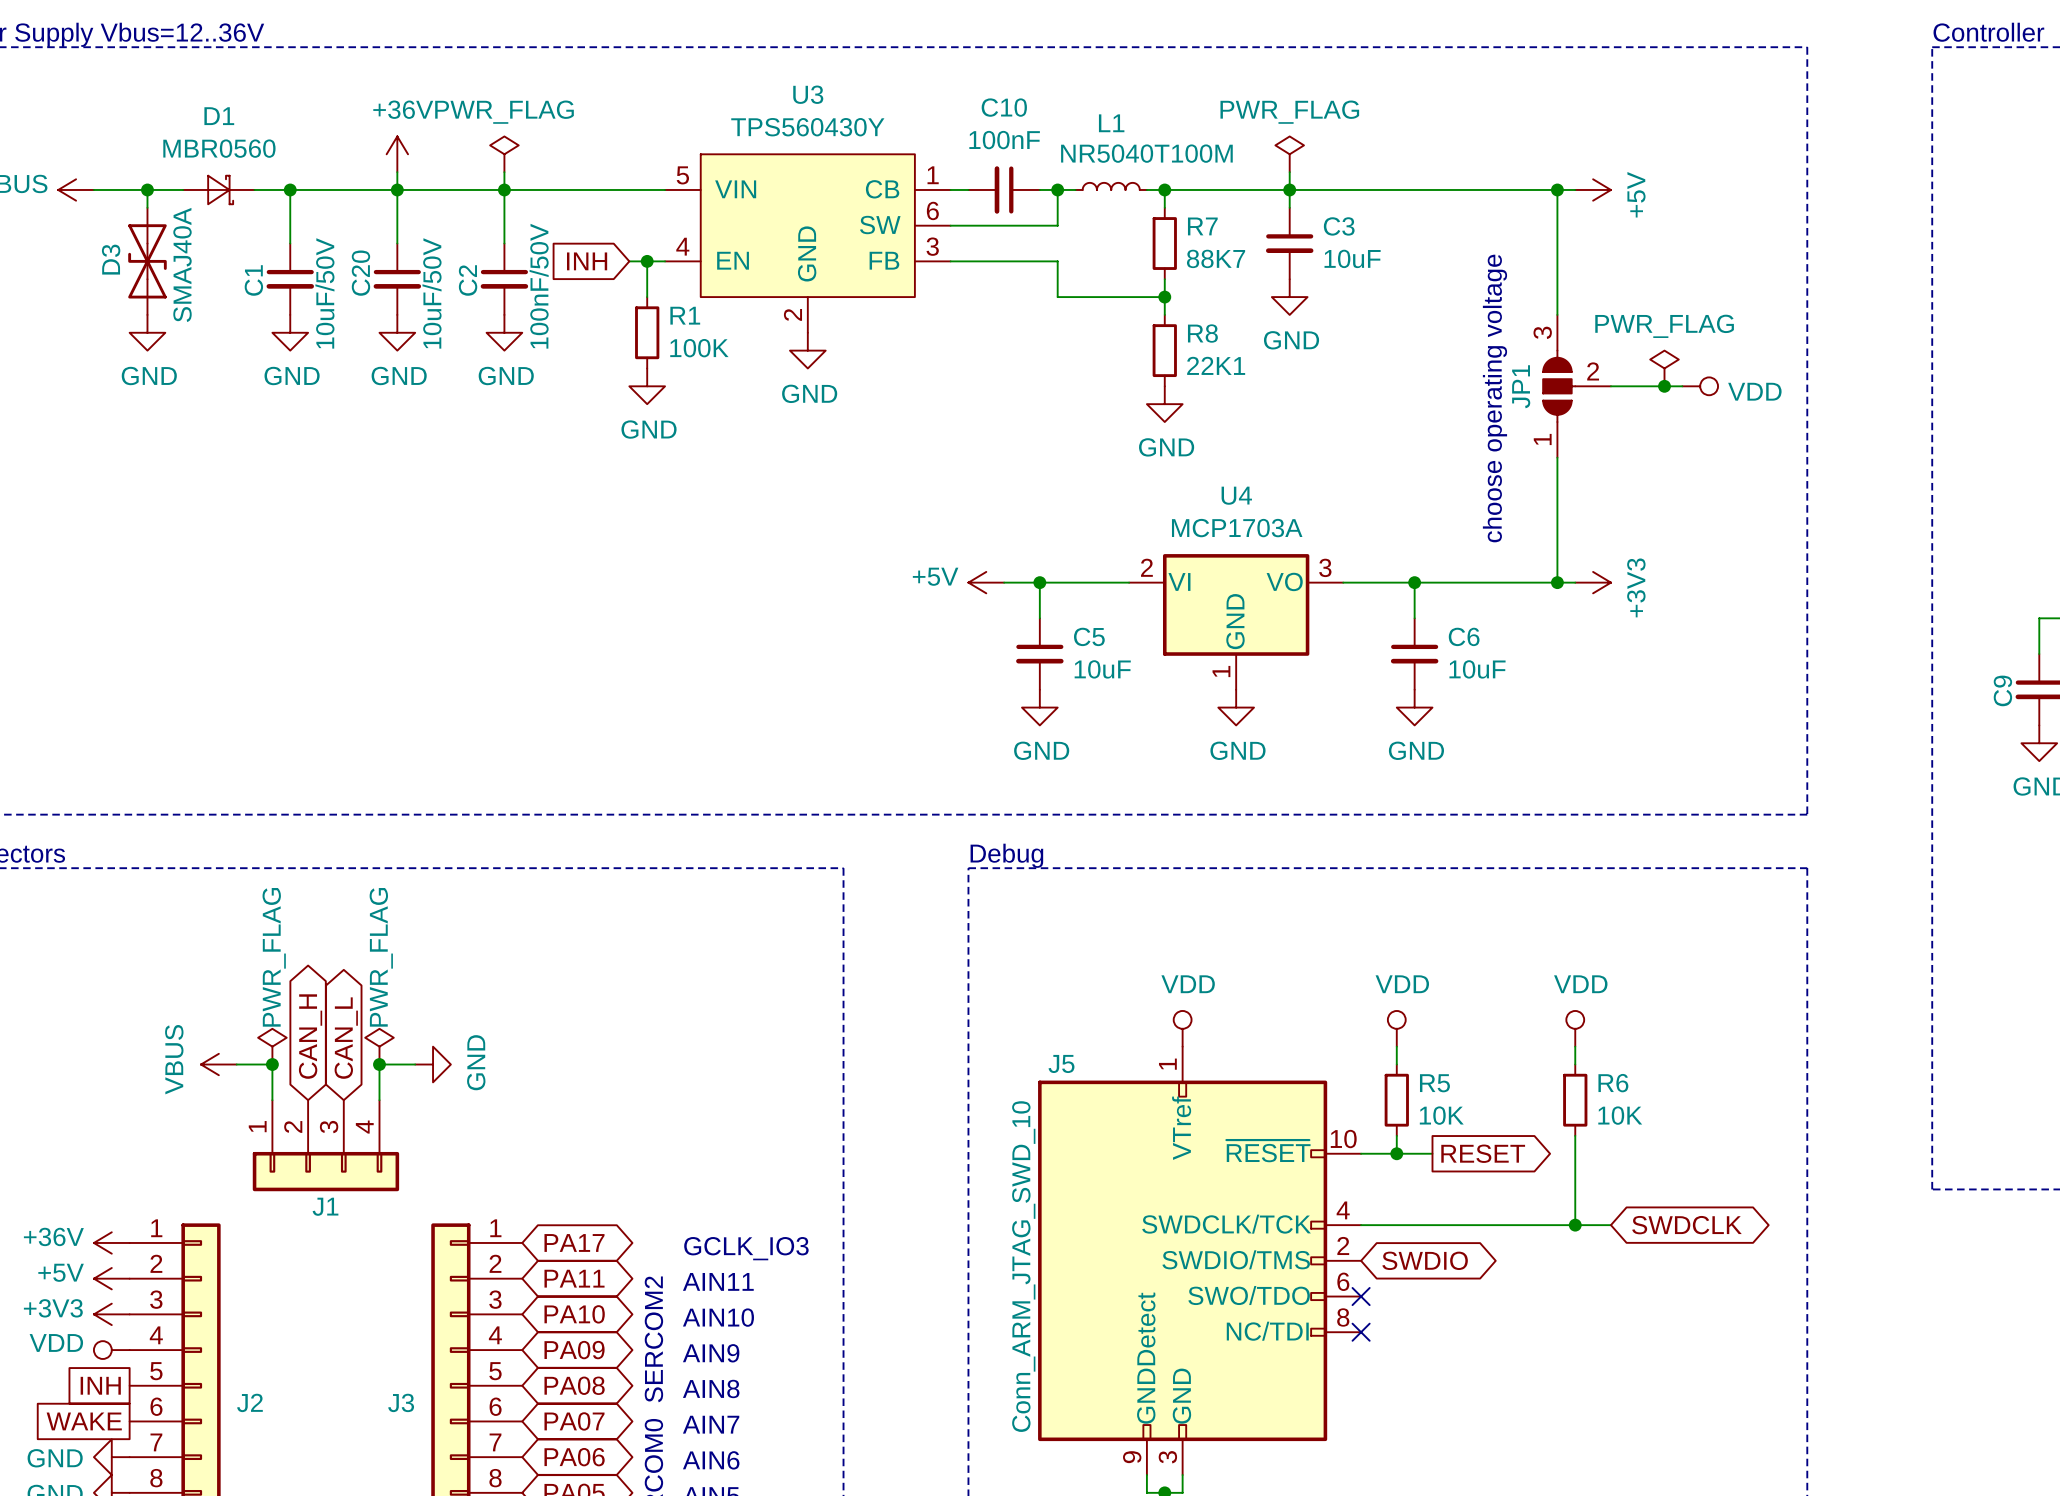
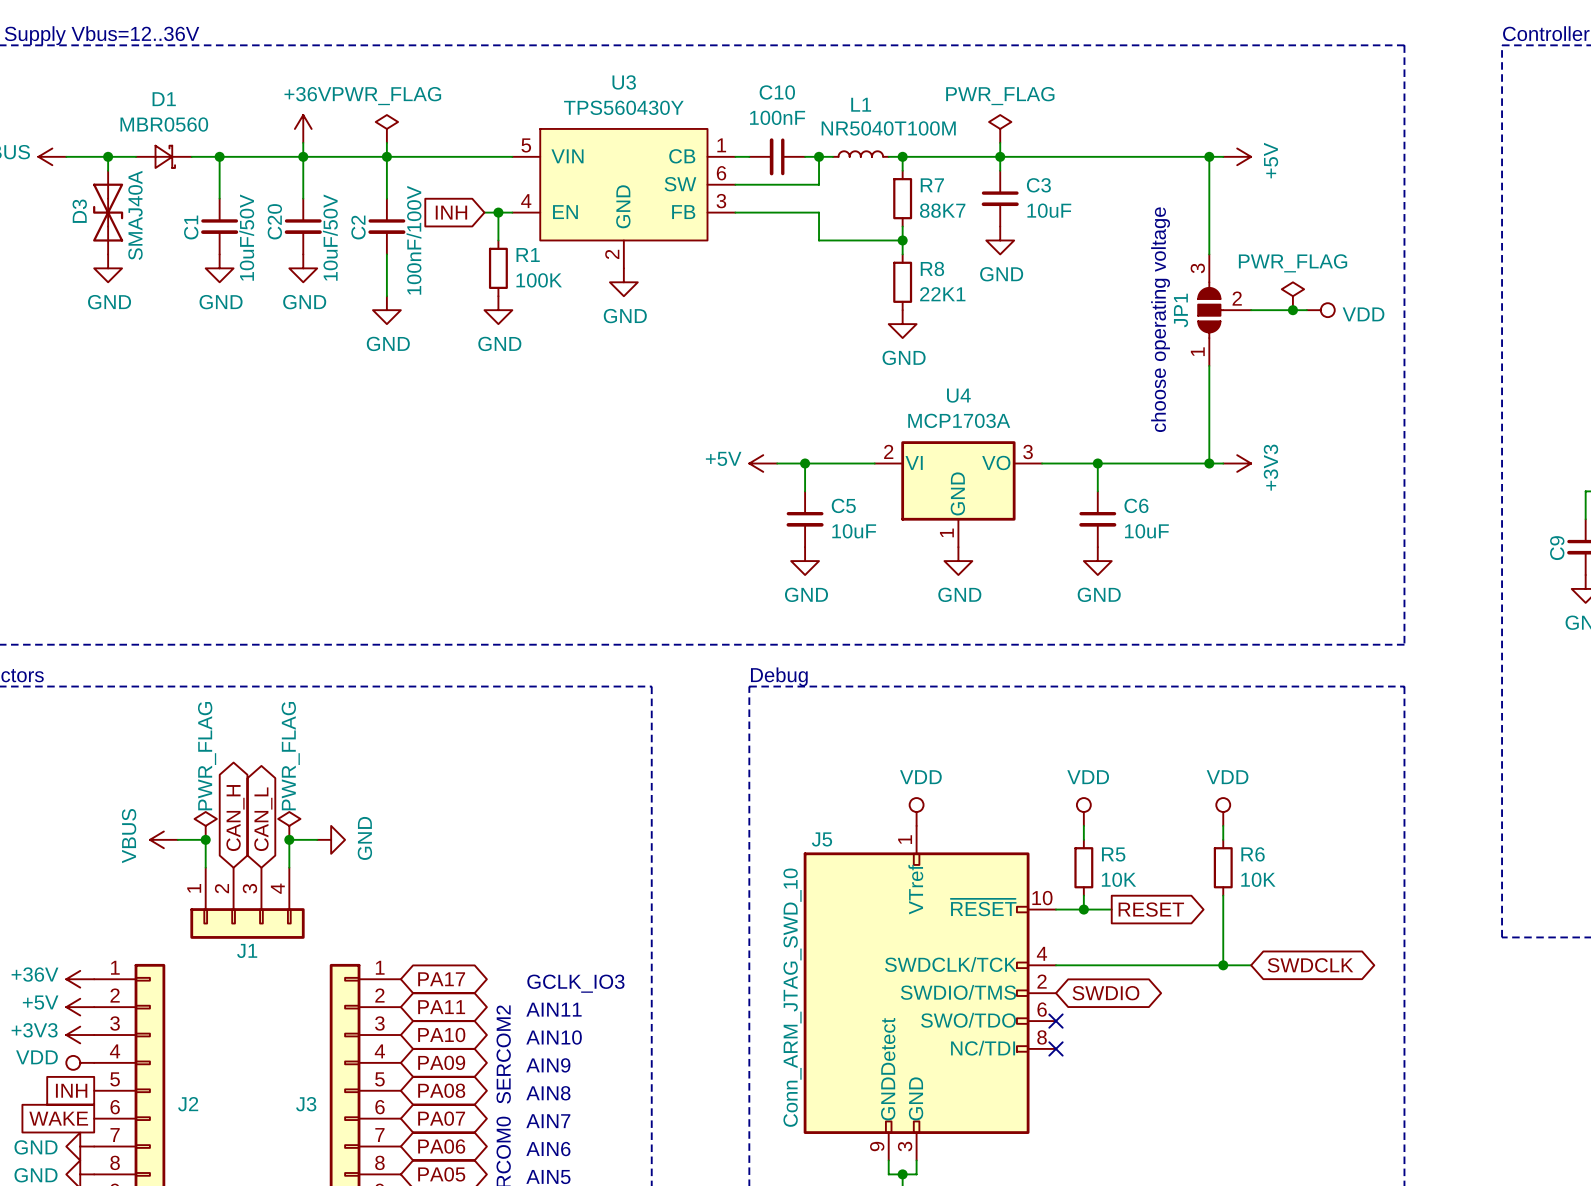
C2 value: 100nF/50V (539, 286) -> 100nF/100V (413, 240)
wire: none -> (386, 254) (386, 296)
power symbol position: GND (504, 332) -> GND (386, 310)

